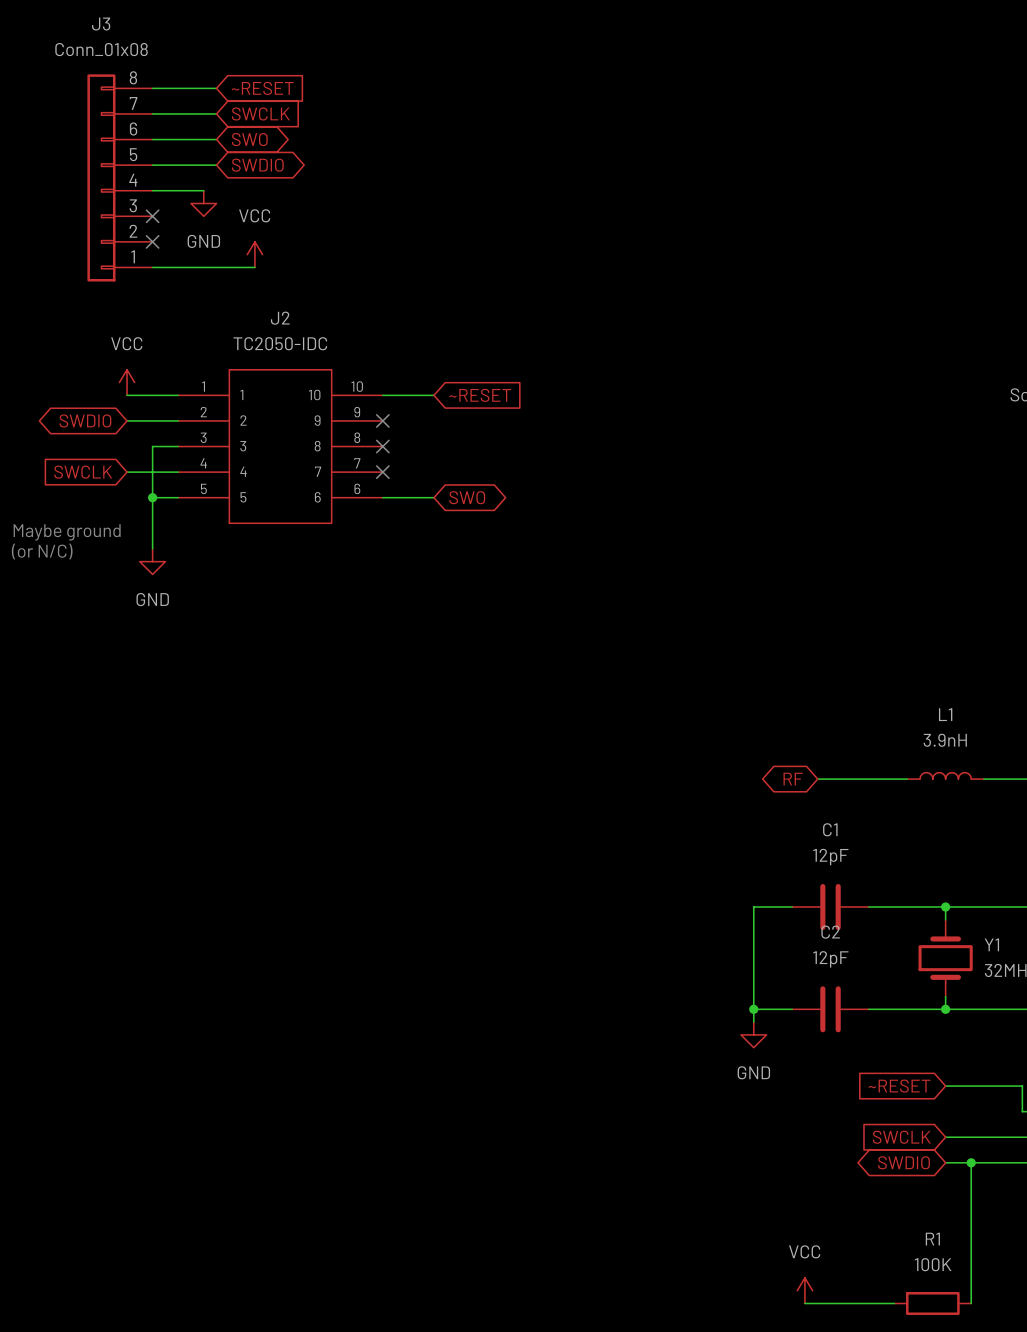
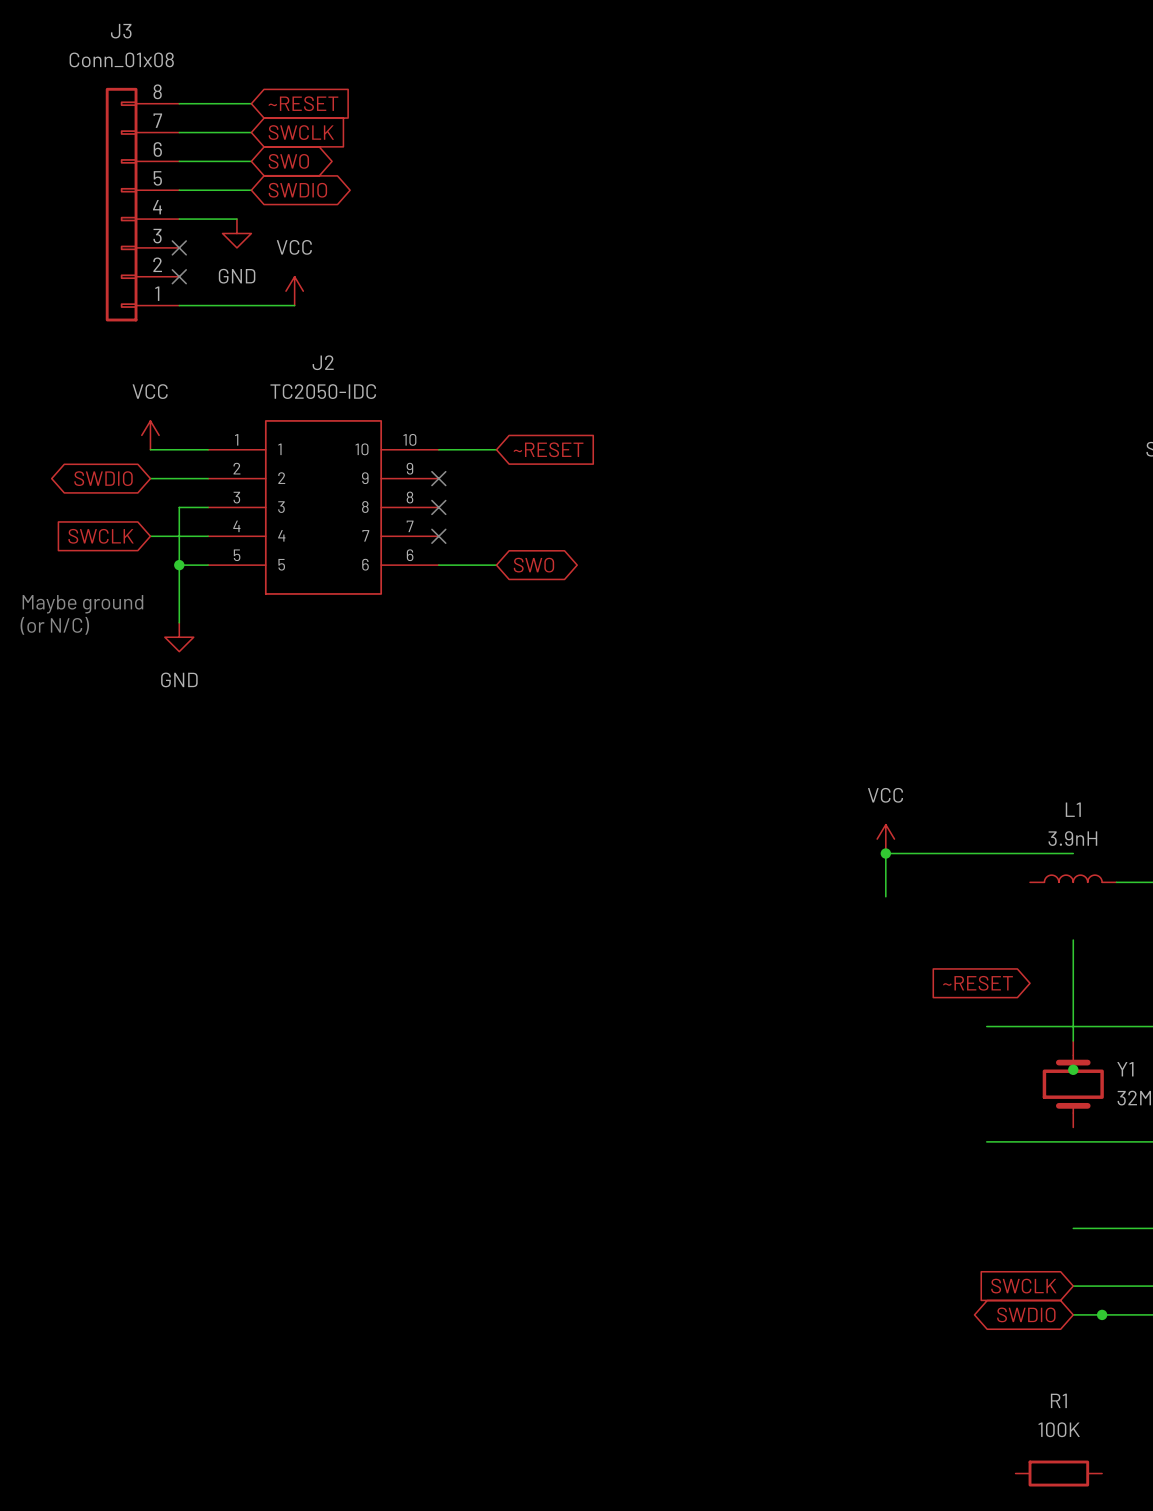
power symbol: none -> VCC (885, 839)
junction: none -> (885, 853)
wire: none -> (1073, 853) (885, 853) (885, 896)
global label: RF (793, 779) -> none
wire: (817, 779) (907, 779) -> none
wire: none -> (1073, 940) (1073, 1026)
wire: (792, 906) (753, 906) (753, 1022) -> none
C1: 12pF (830, 906) -> none
junction: (945, 906) -> none
junction: none -> (1073, 1069)
wire: (945, 996) (945, 1009) -> none
wire: (753, 1009) (792, 1009) -> none
junction: (753, 1009) -> none
C2: 12pF (830, 1009) -> none
junction: (945, 1009) -> none
power symbol: GND (753, 1034) -> none
global label position: ~RESET (899, 1086) -> ~RESET (977, 983)
wire: (971, 1162) (971, 1303) -> none
power symbol: VCC (804, 1290) -> none
wire: (804, 1303) (894, 1303) -> none

